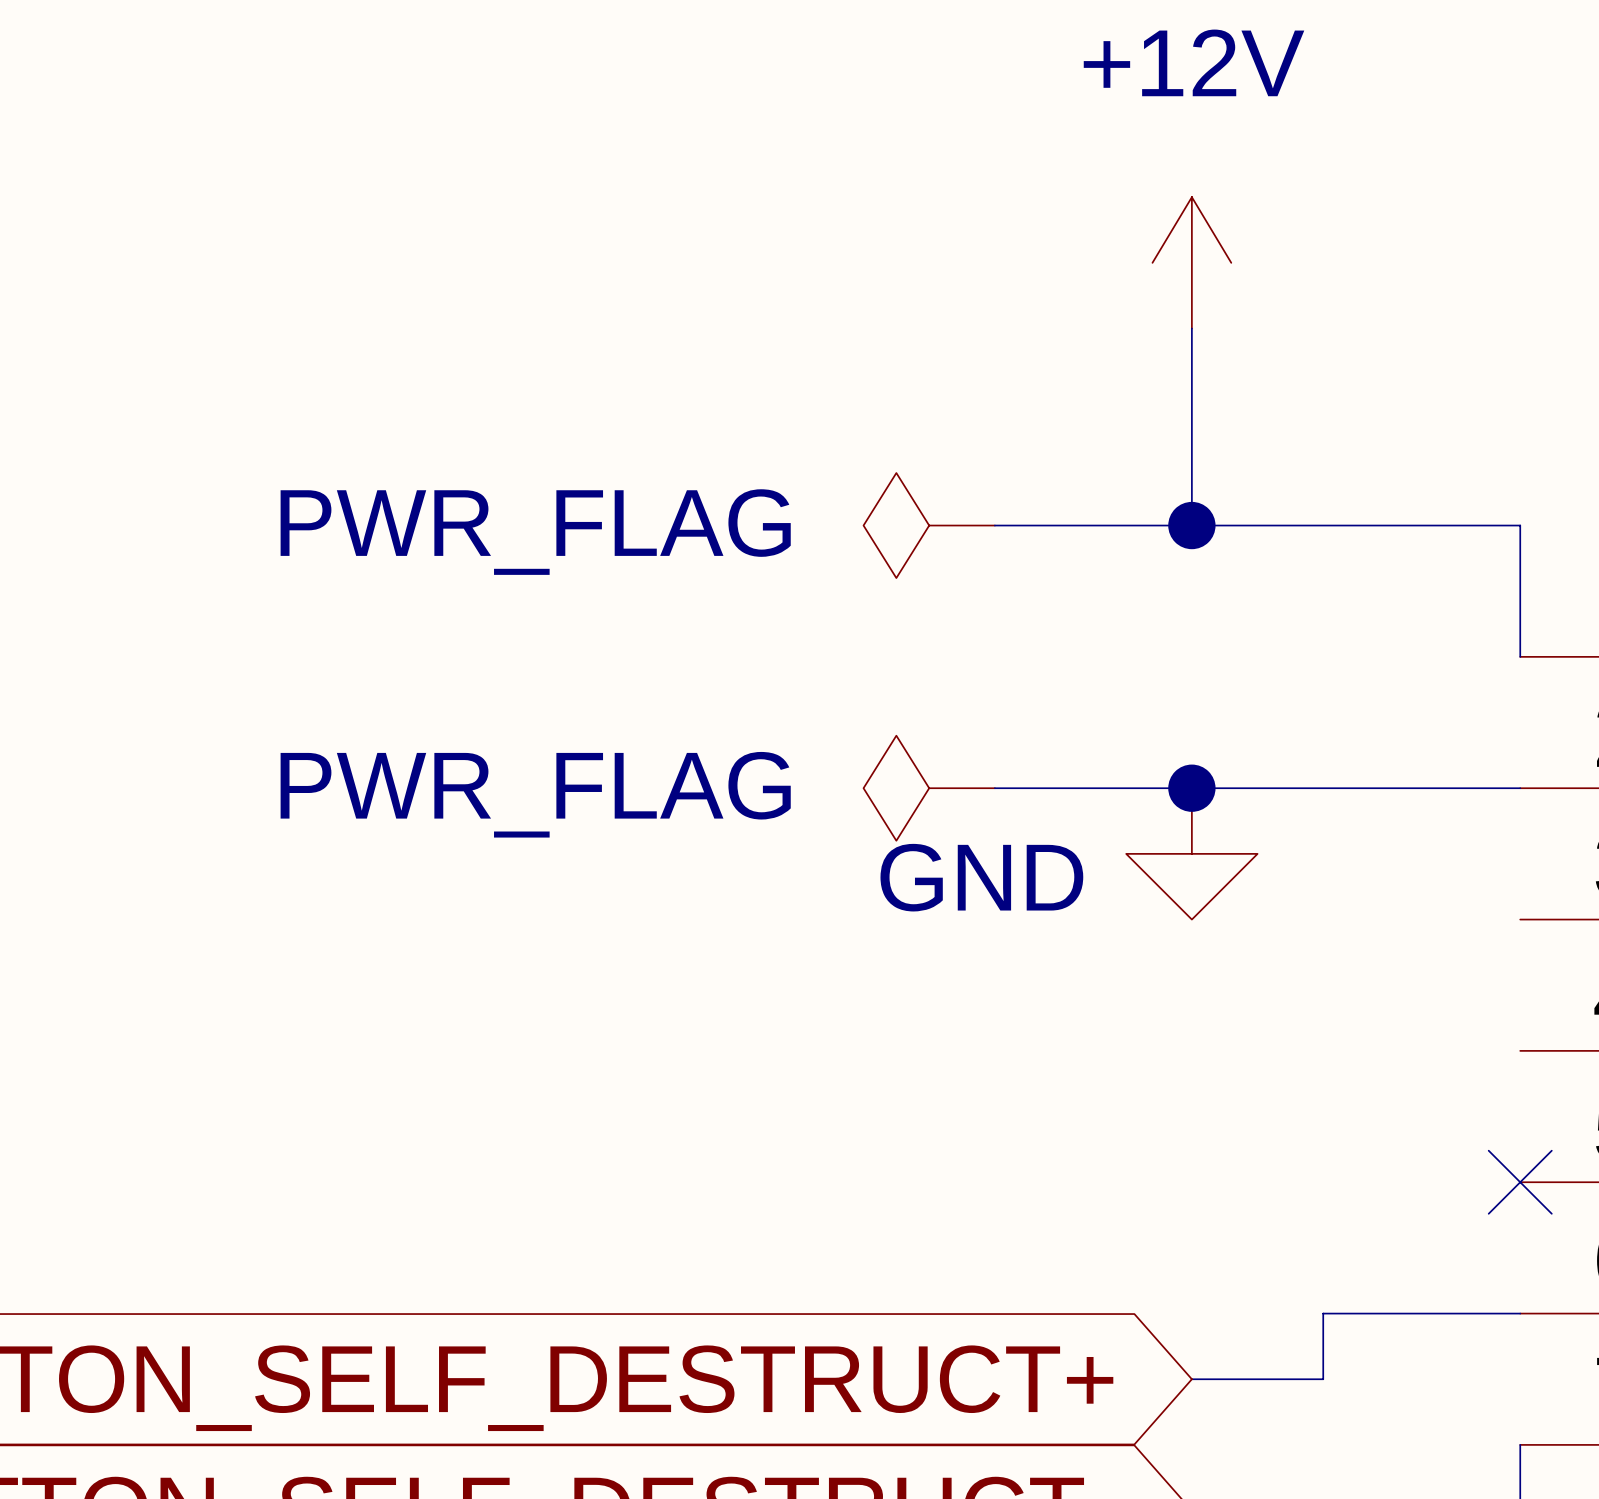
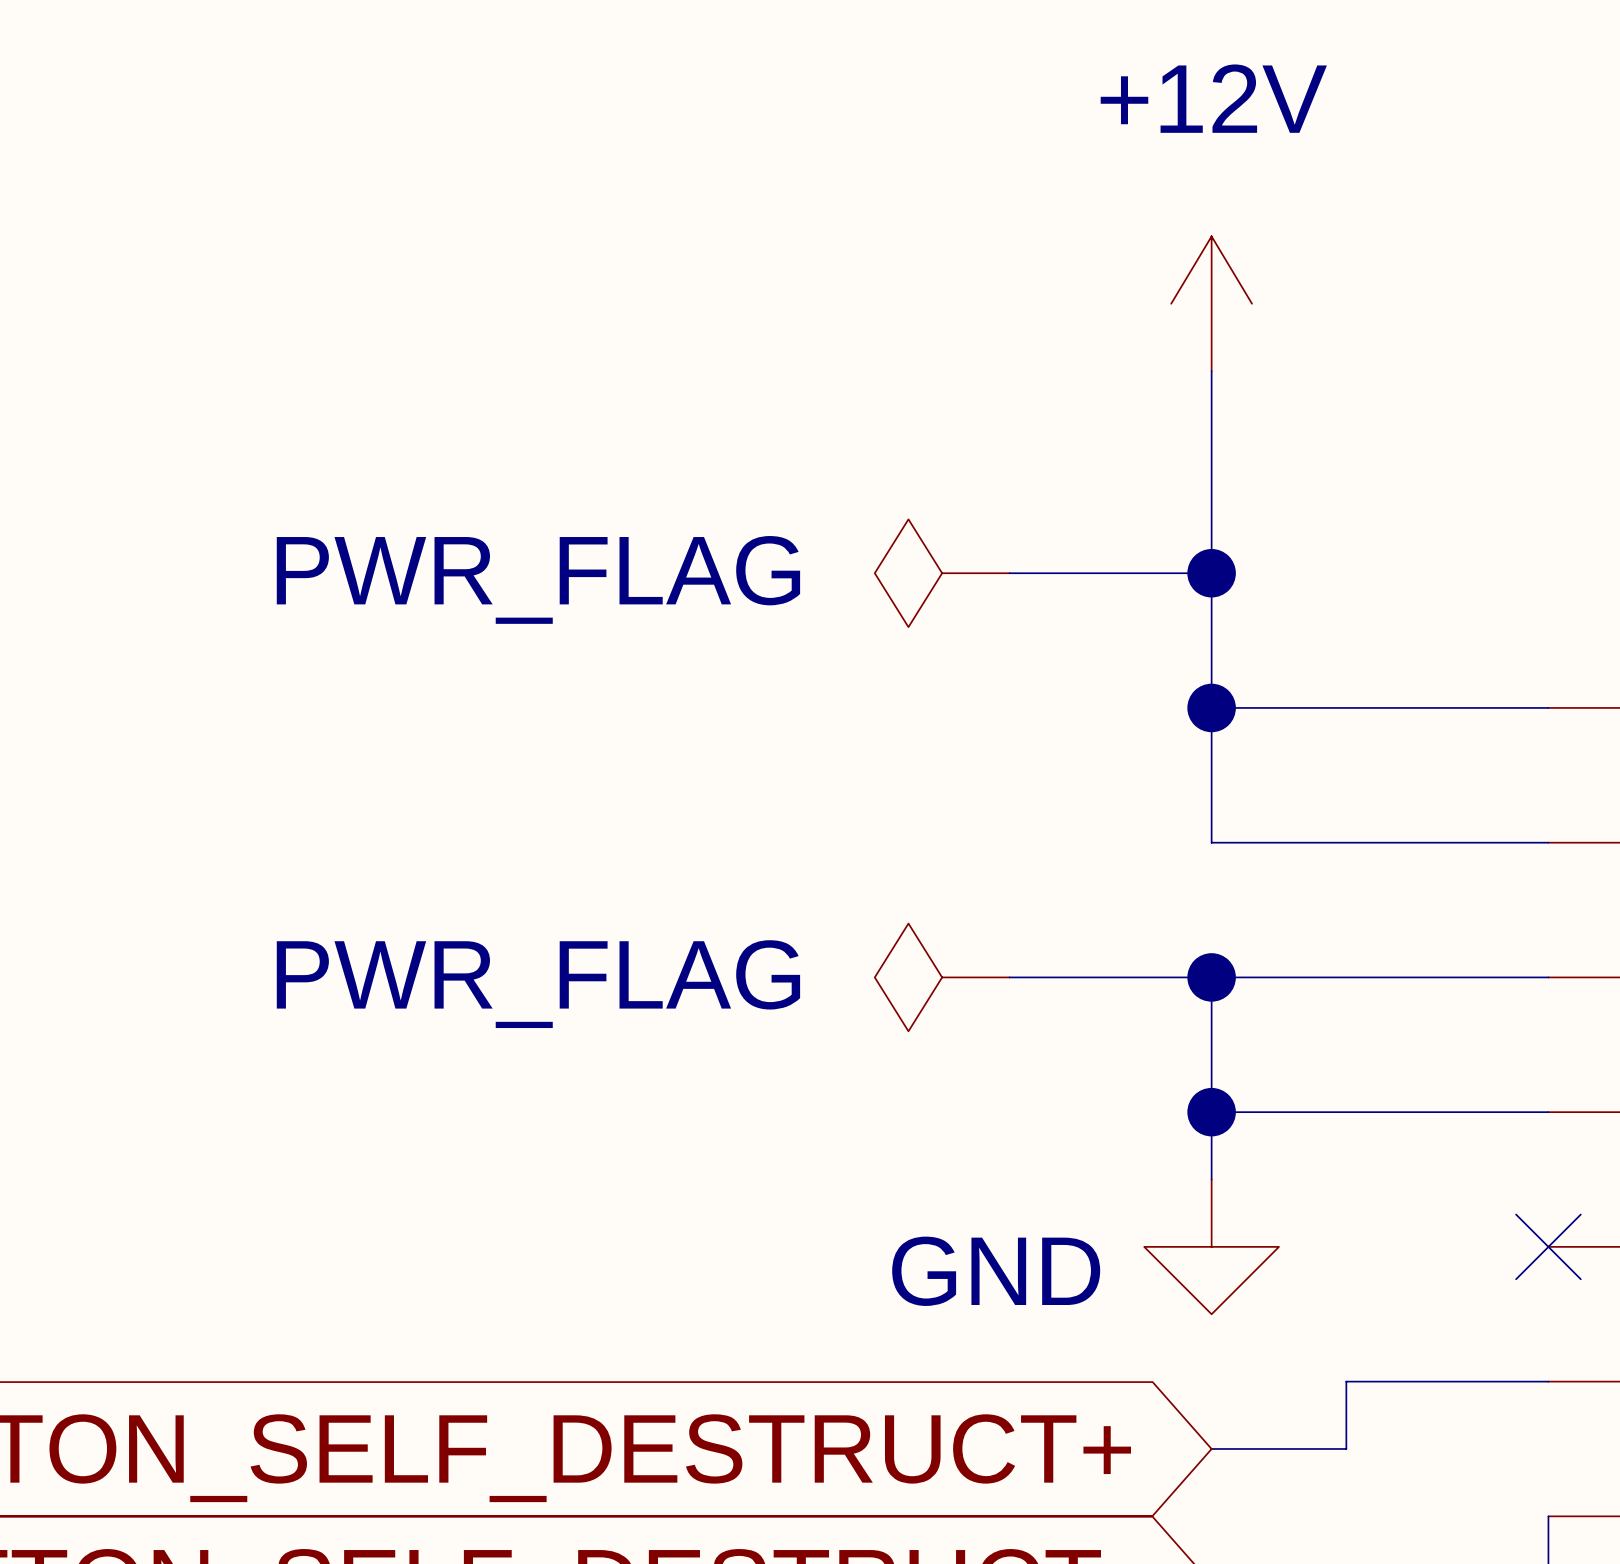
wire: (1191, 525) (1520, 525) (1520, 656) -> (1211, 707) (1548, 707)
junction: none -> (1211, 707)
power symbol position: PWR_FLAG (929, 788) -> PWR_FLAG (942, 977)
wire: (994, 788) (1191, 788) -> (1211, 573) (1211, 842)
junction: (1191, 788) -> none
power symbol position: GND (1191, 853) -> GND (1211, 1246)
wire: none -> (1009, 977) (1548, 977)
wire: none -> (1211, 977) (1211, 1179)
junction: none -> (1211, 977)
wire: none -> (1211, 1112) (1548, 1112)
junction: none -> (1211, 1112)

